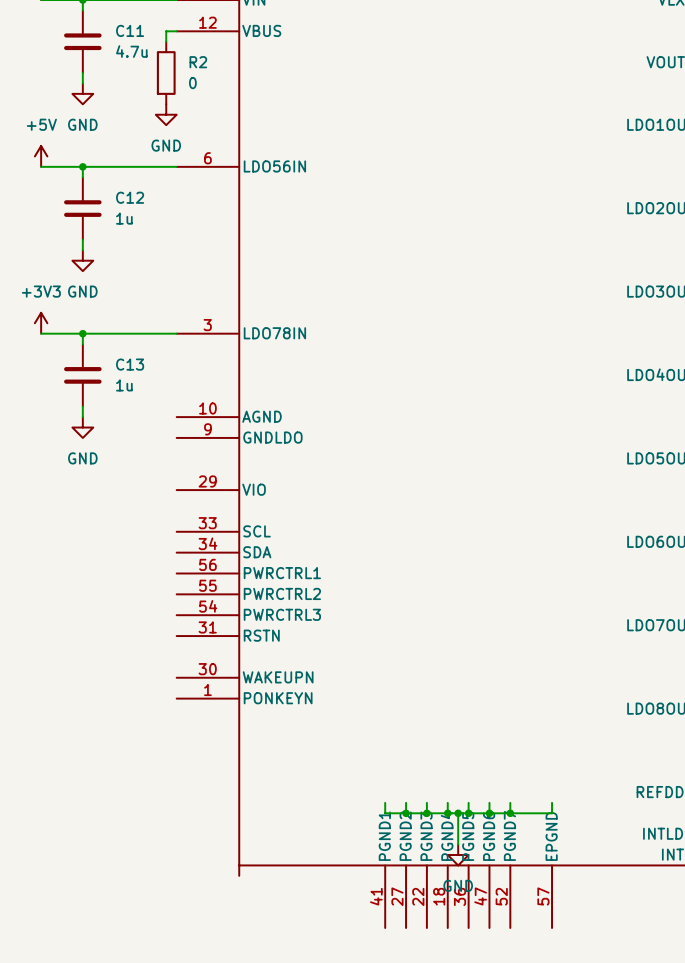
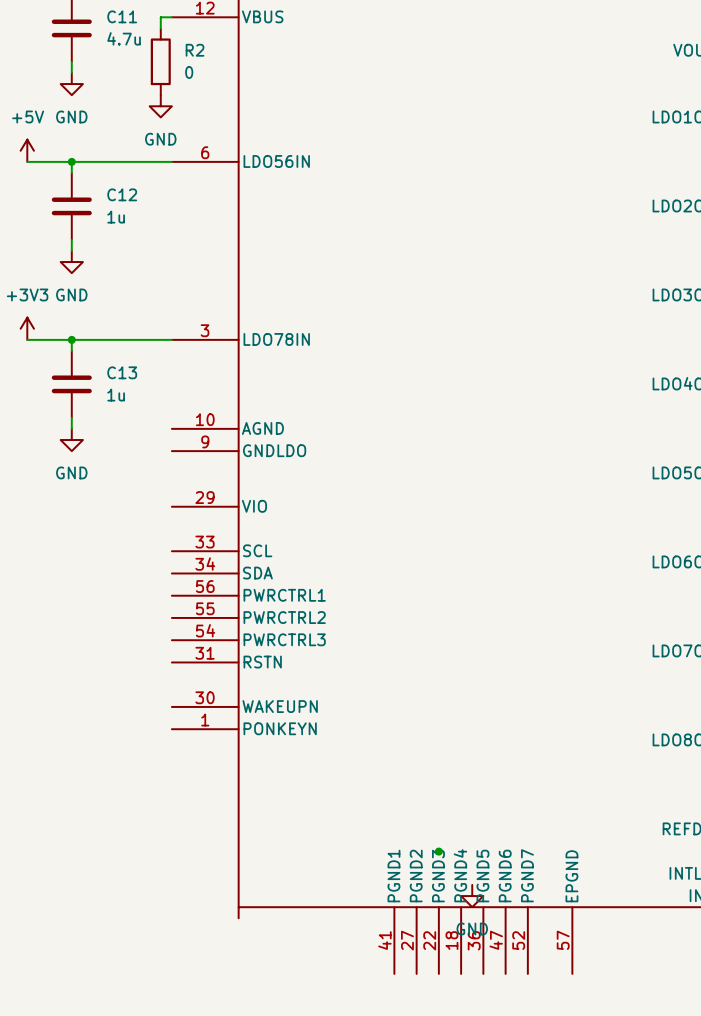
wire: (385, 802) (385, 813) (552, 813) (552, 802) -> none
wire: (406, 802) (406, 813) -> none
wire: (426, 802) (426, 813) -> none
wire: (447, 802) (447, 813) -> none
wire: (468, 802) (468, 813) -> none
wire: (489, 802) (489, 813) -> none
wire: (510, 802) (510, 813) -> none
junction: (406, 813) -> none
junction: (447, 813) -> none
wire: (458, 813) (458, 844) -> none
junction: (458, 813) -> none
junction: (468, 813) -> none
junction: (489, 813) -> none
junction: (510, 813) -> none

